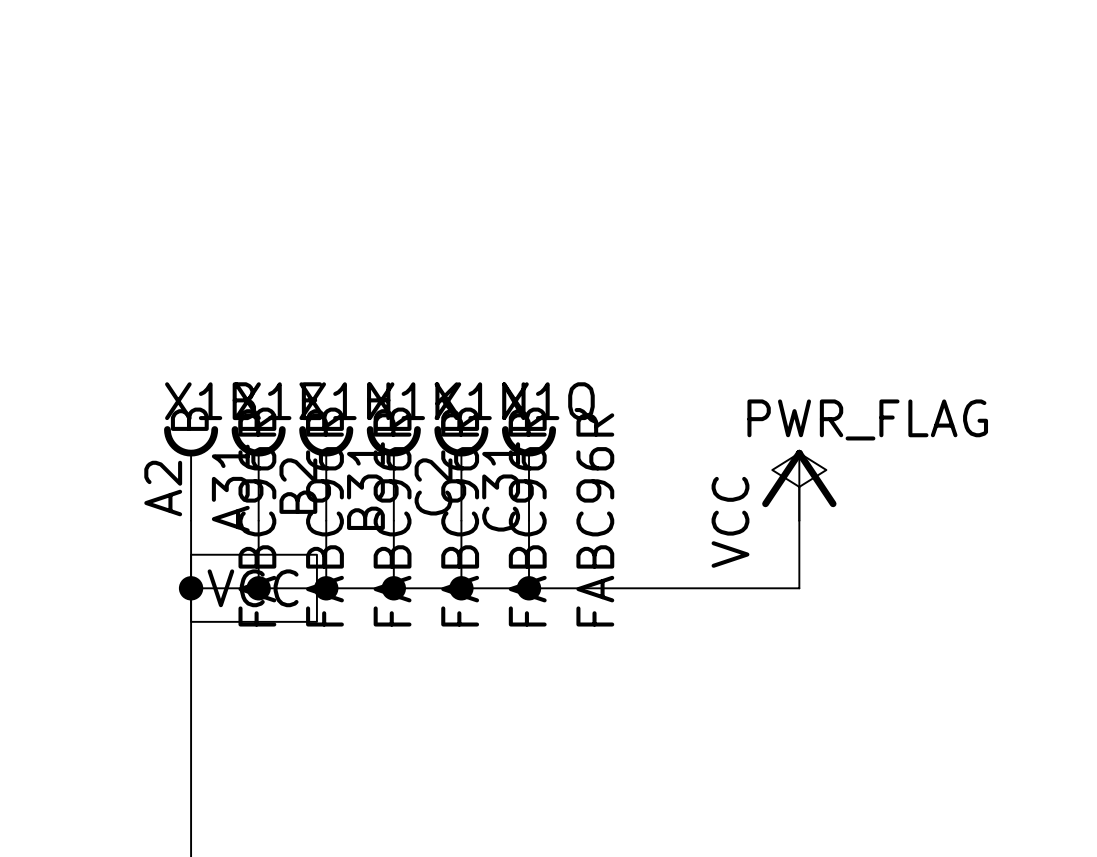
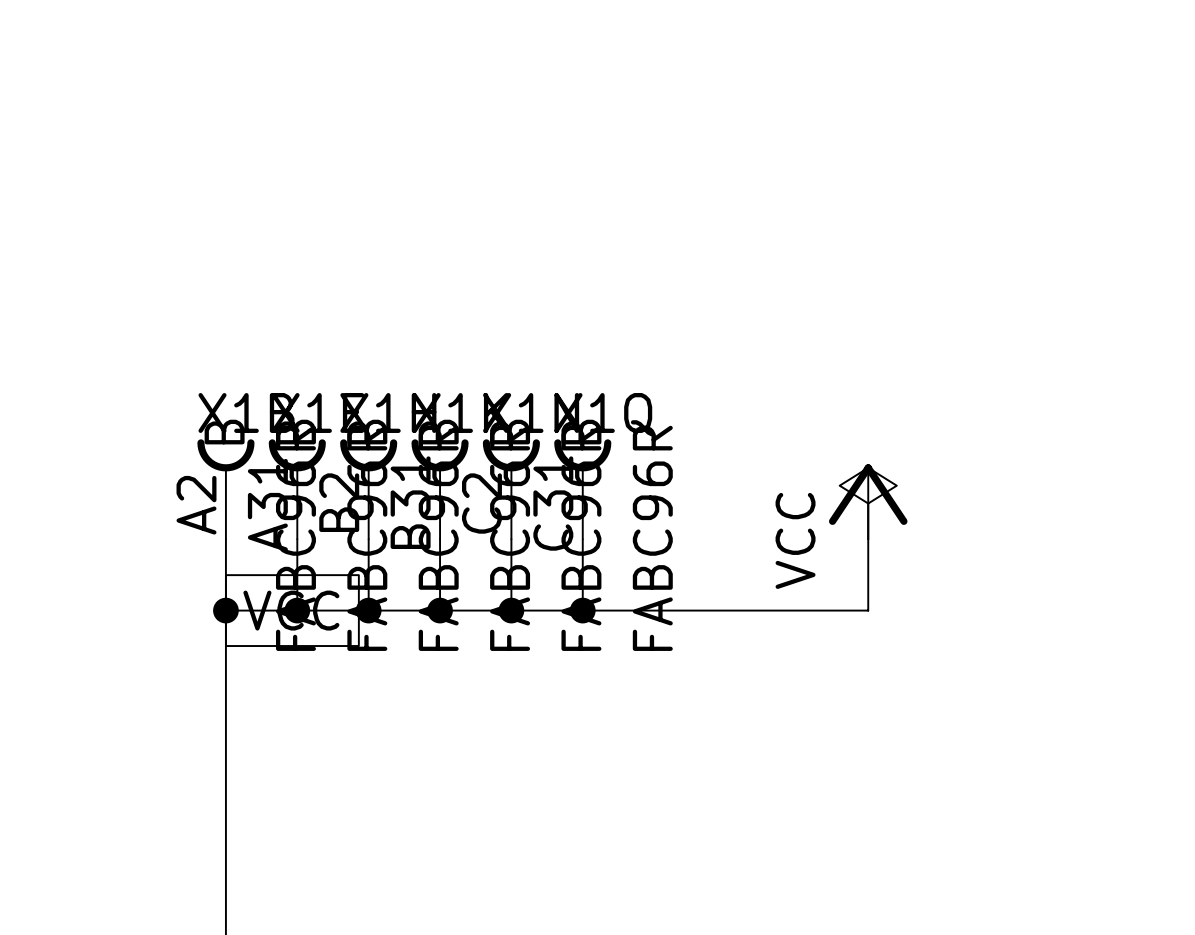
power symbol text: PWR_FLAG (867, 419) -> none

